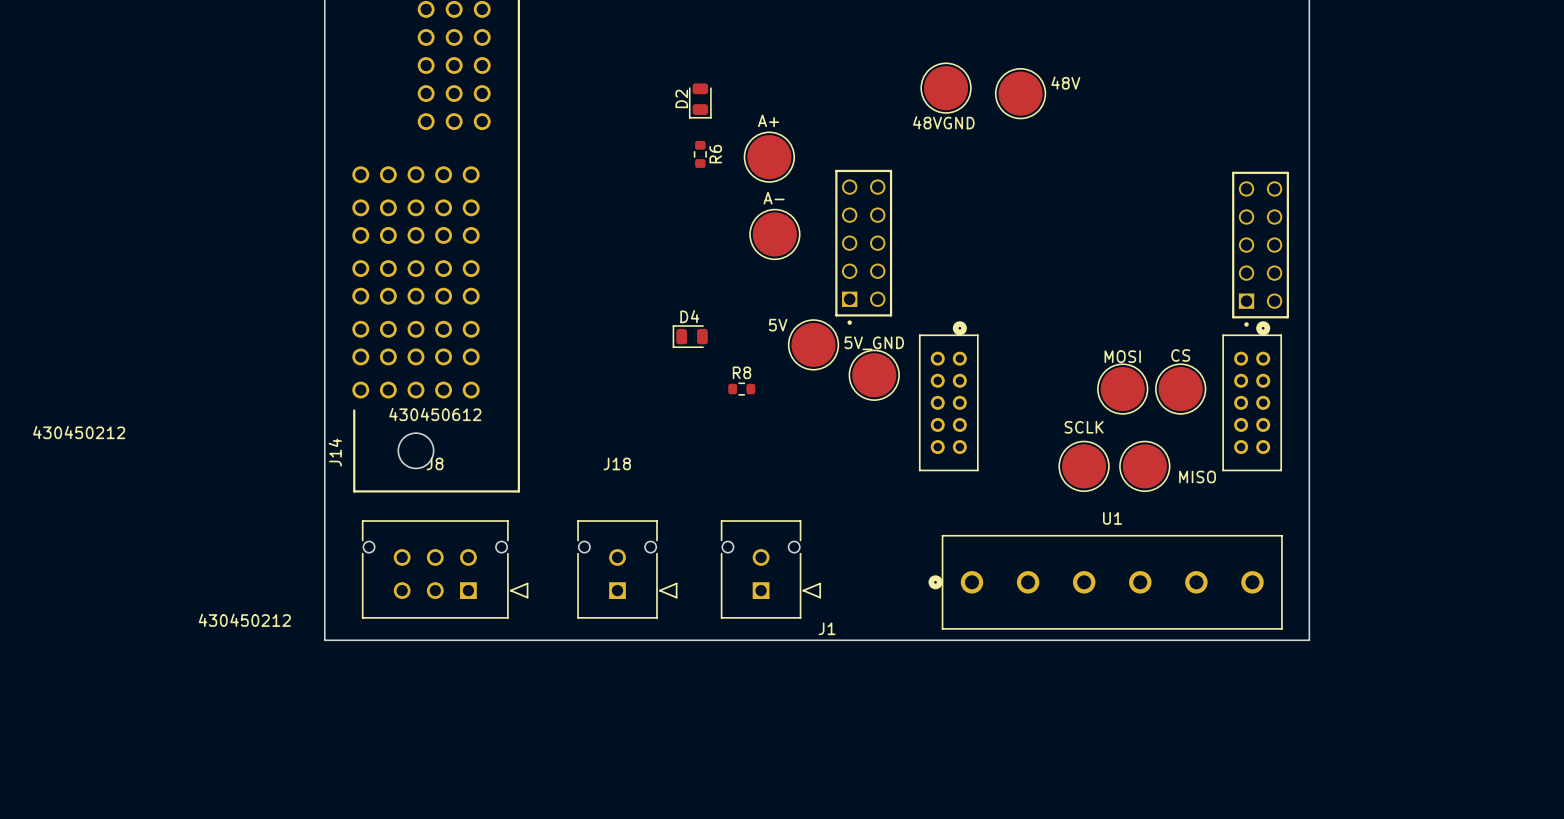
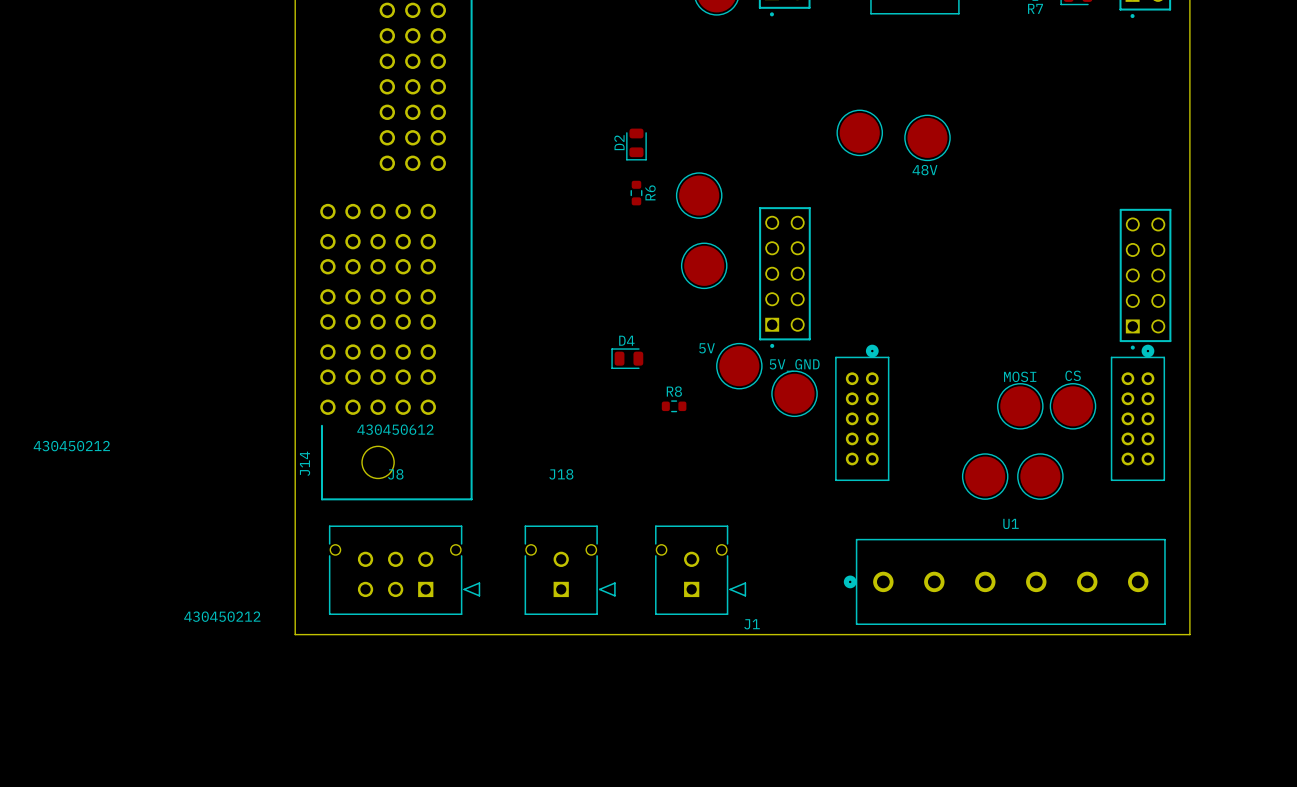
48V name position: 48V (1065, 83) -> 48V (924, 170)
text: A+ (768, 120) -> none
text: 48VGND (943, 122) -> none
text: A- (774, 198) -> none
text: SCLK (1084, 427) -> none
text: MISO (1197, 476) -> none

